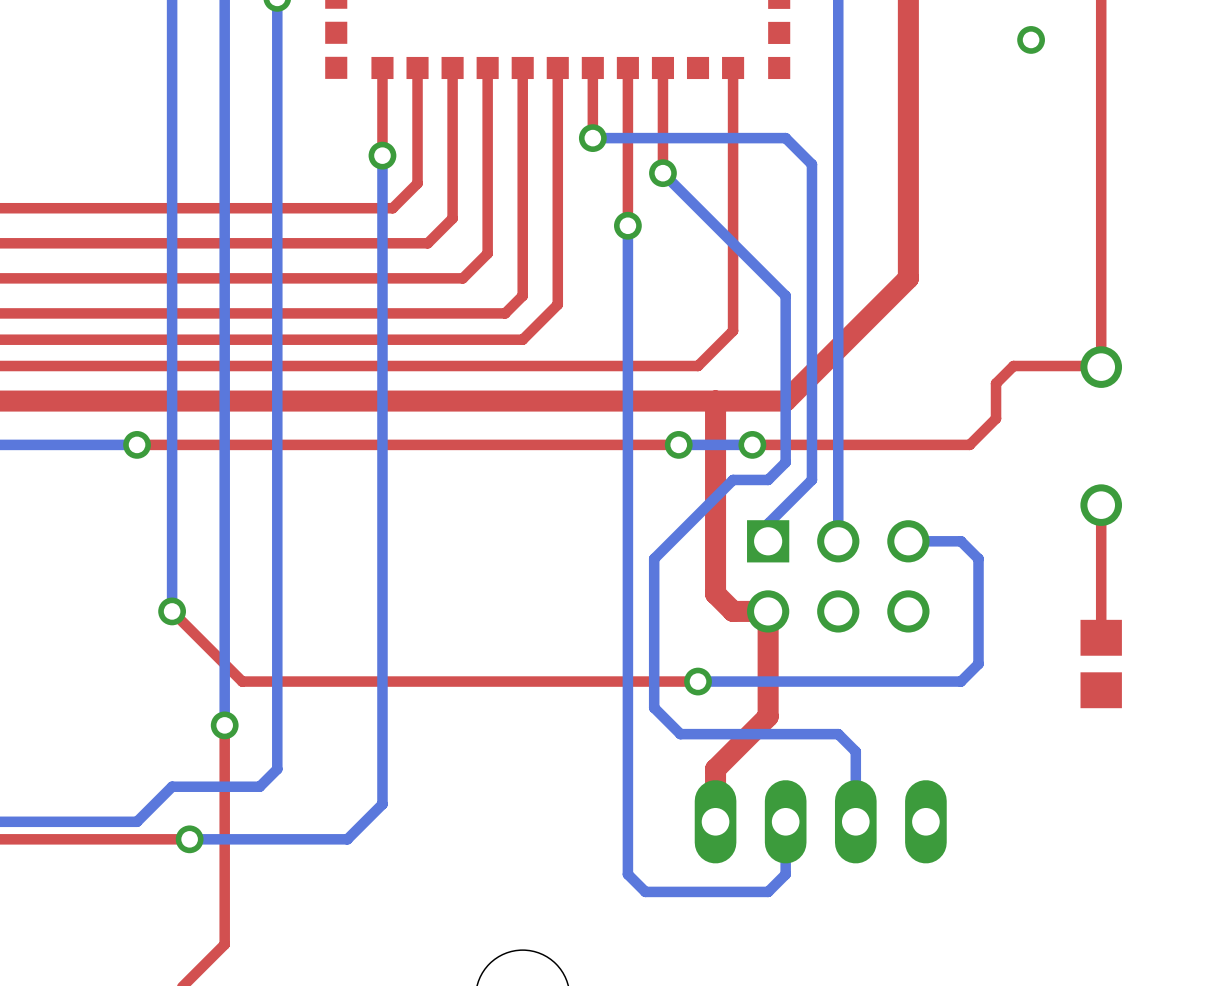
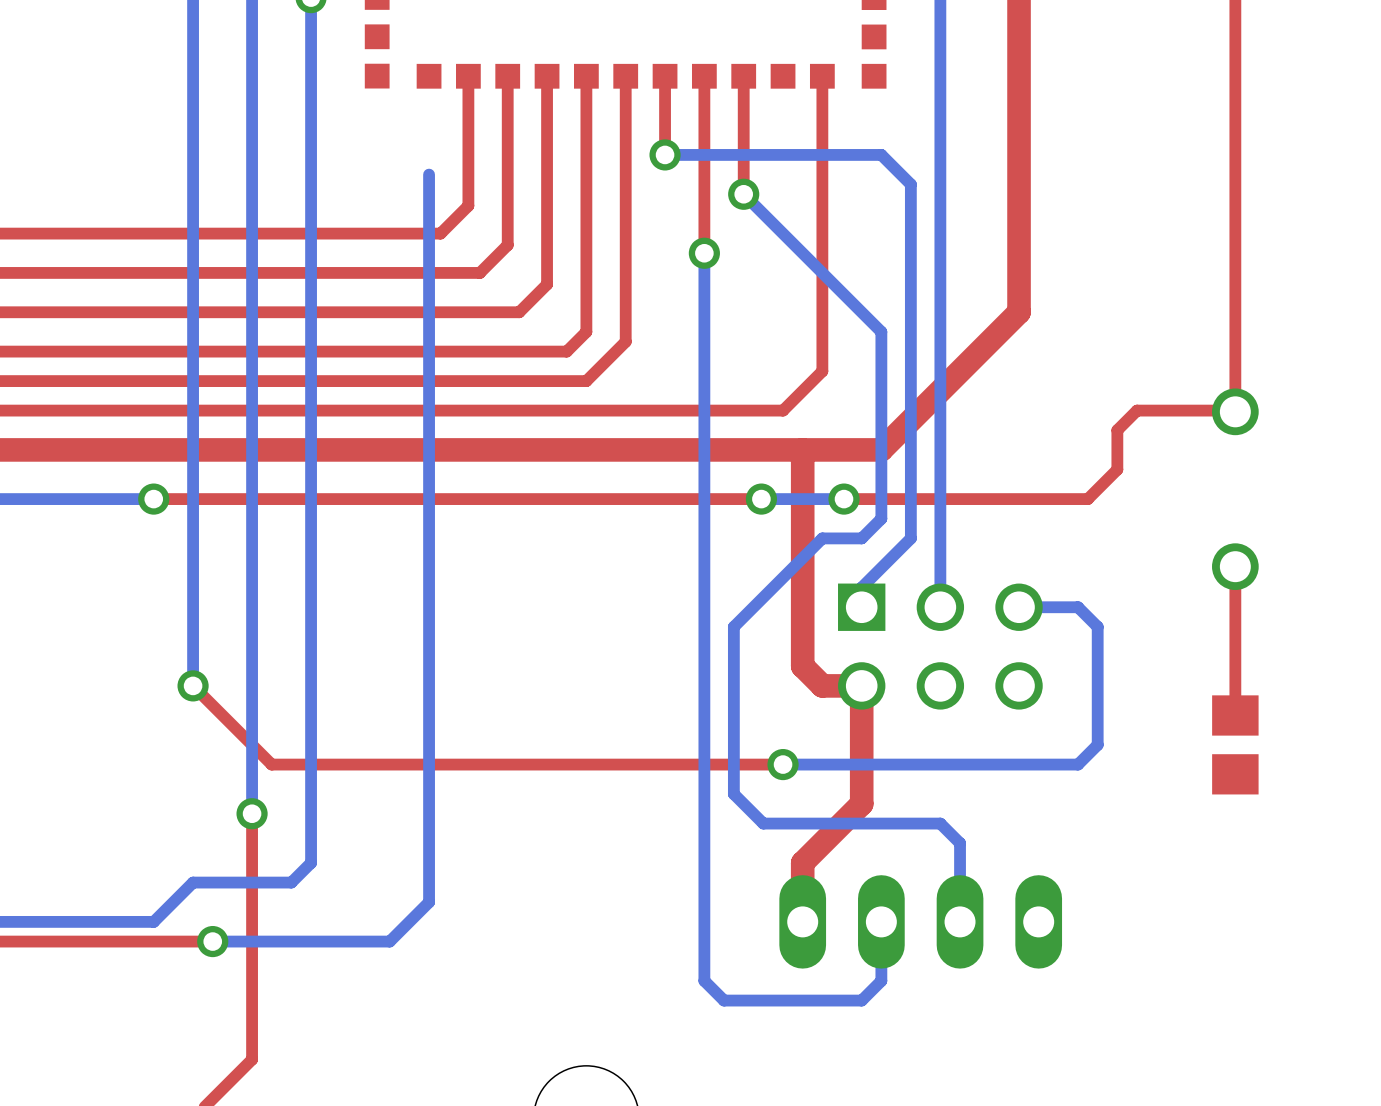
via: (1031, 39) -> none
top track: (382, 67) (382, 155) -> none
via: (382, 155) -> none

